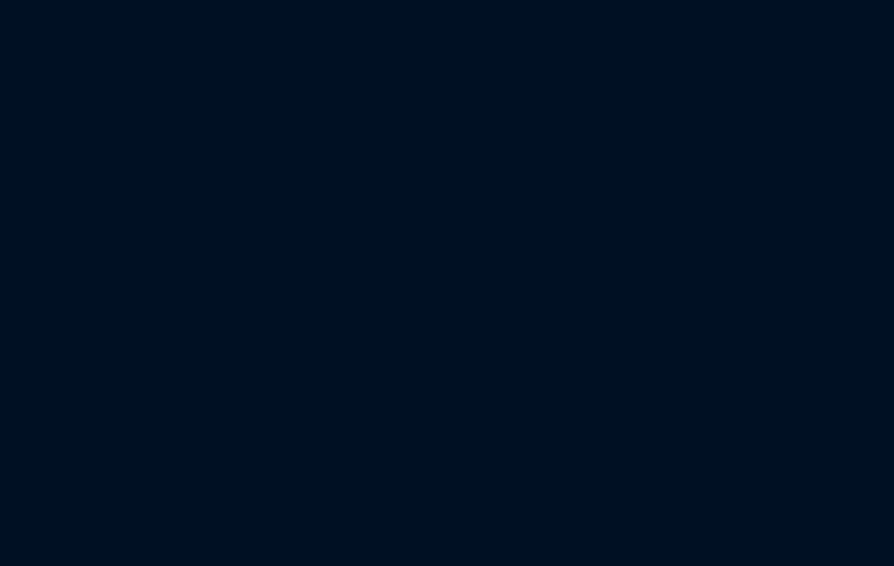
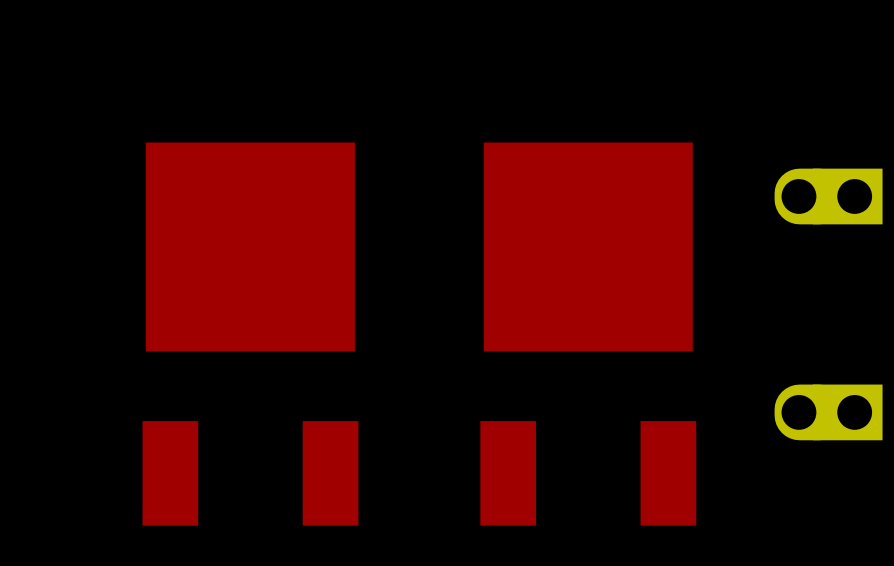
part: none -> (828, 196)
part: none -> (250, 334)
part: none -> (588, 334)
part: none -> (828, 412)

